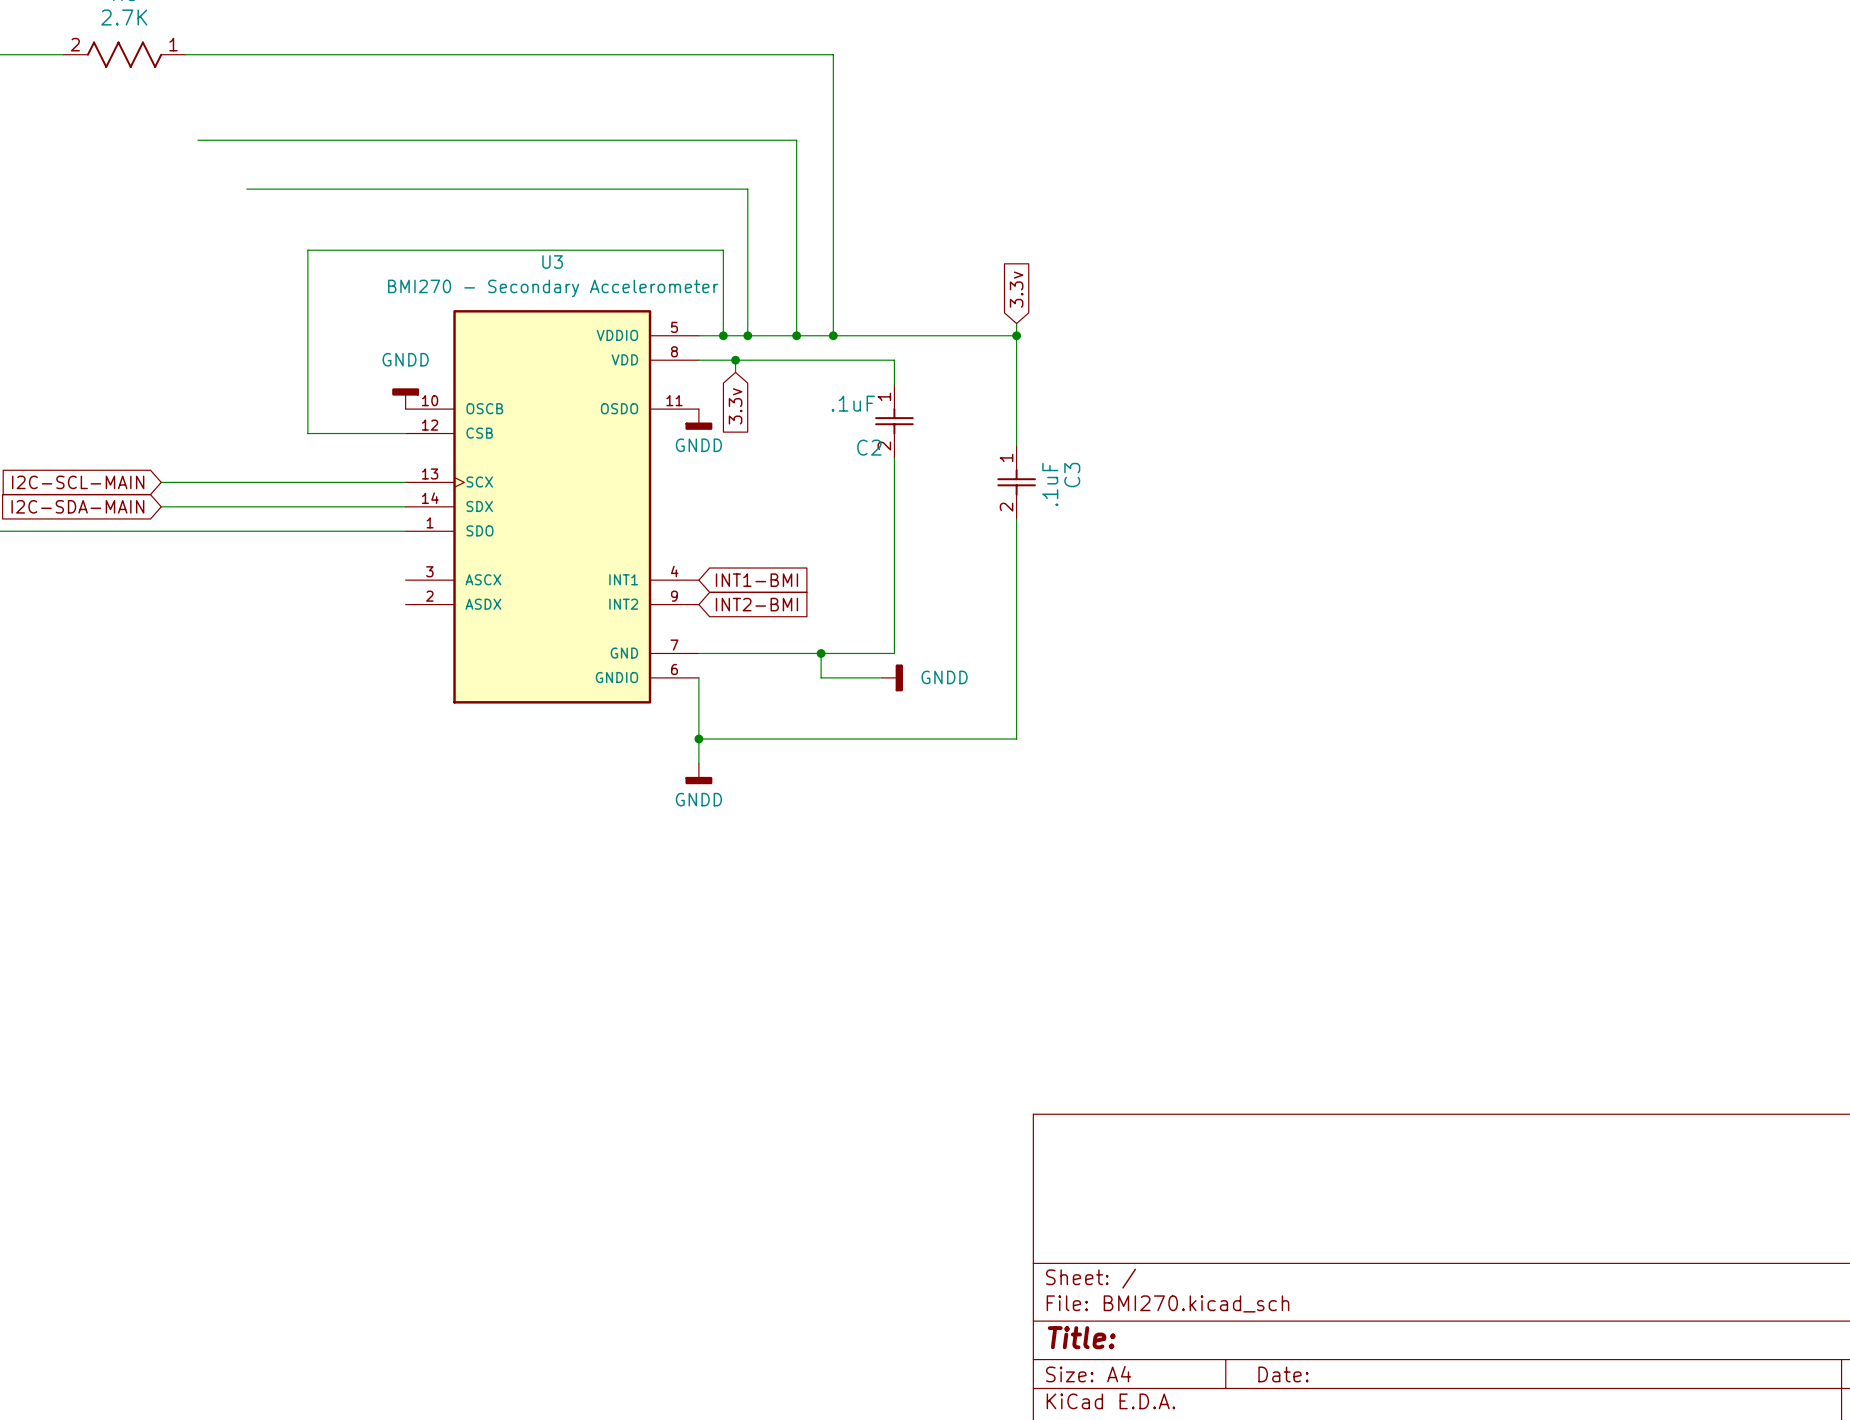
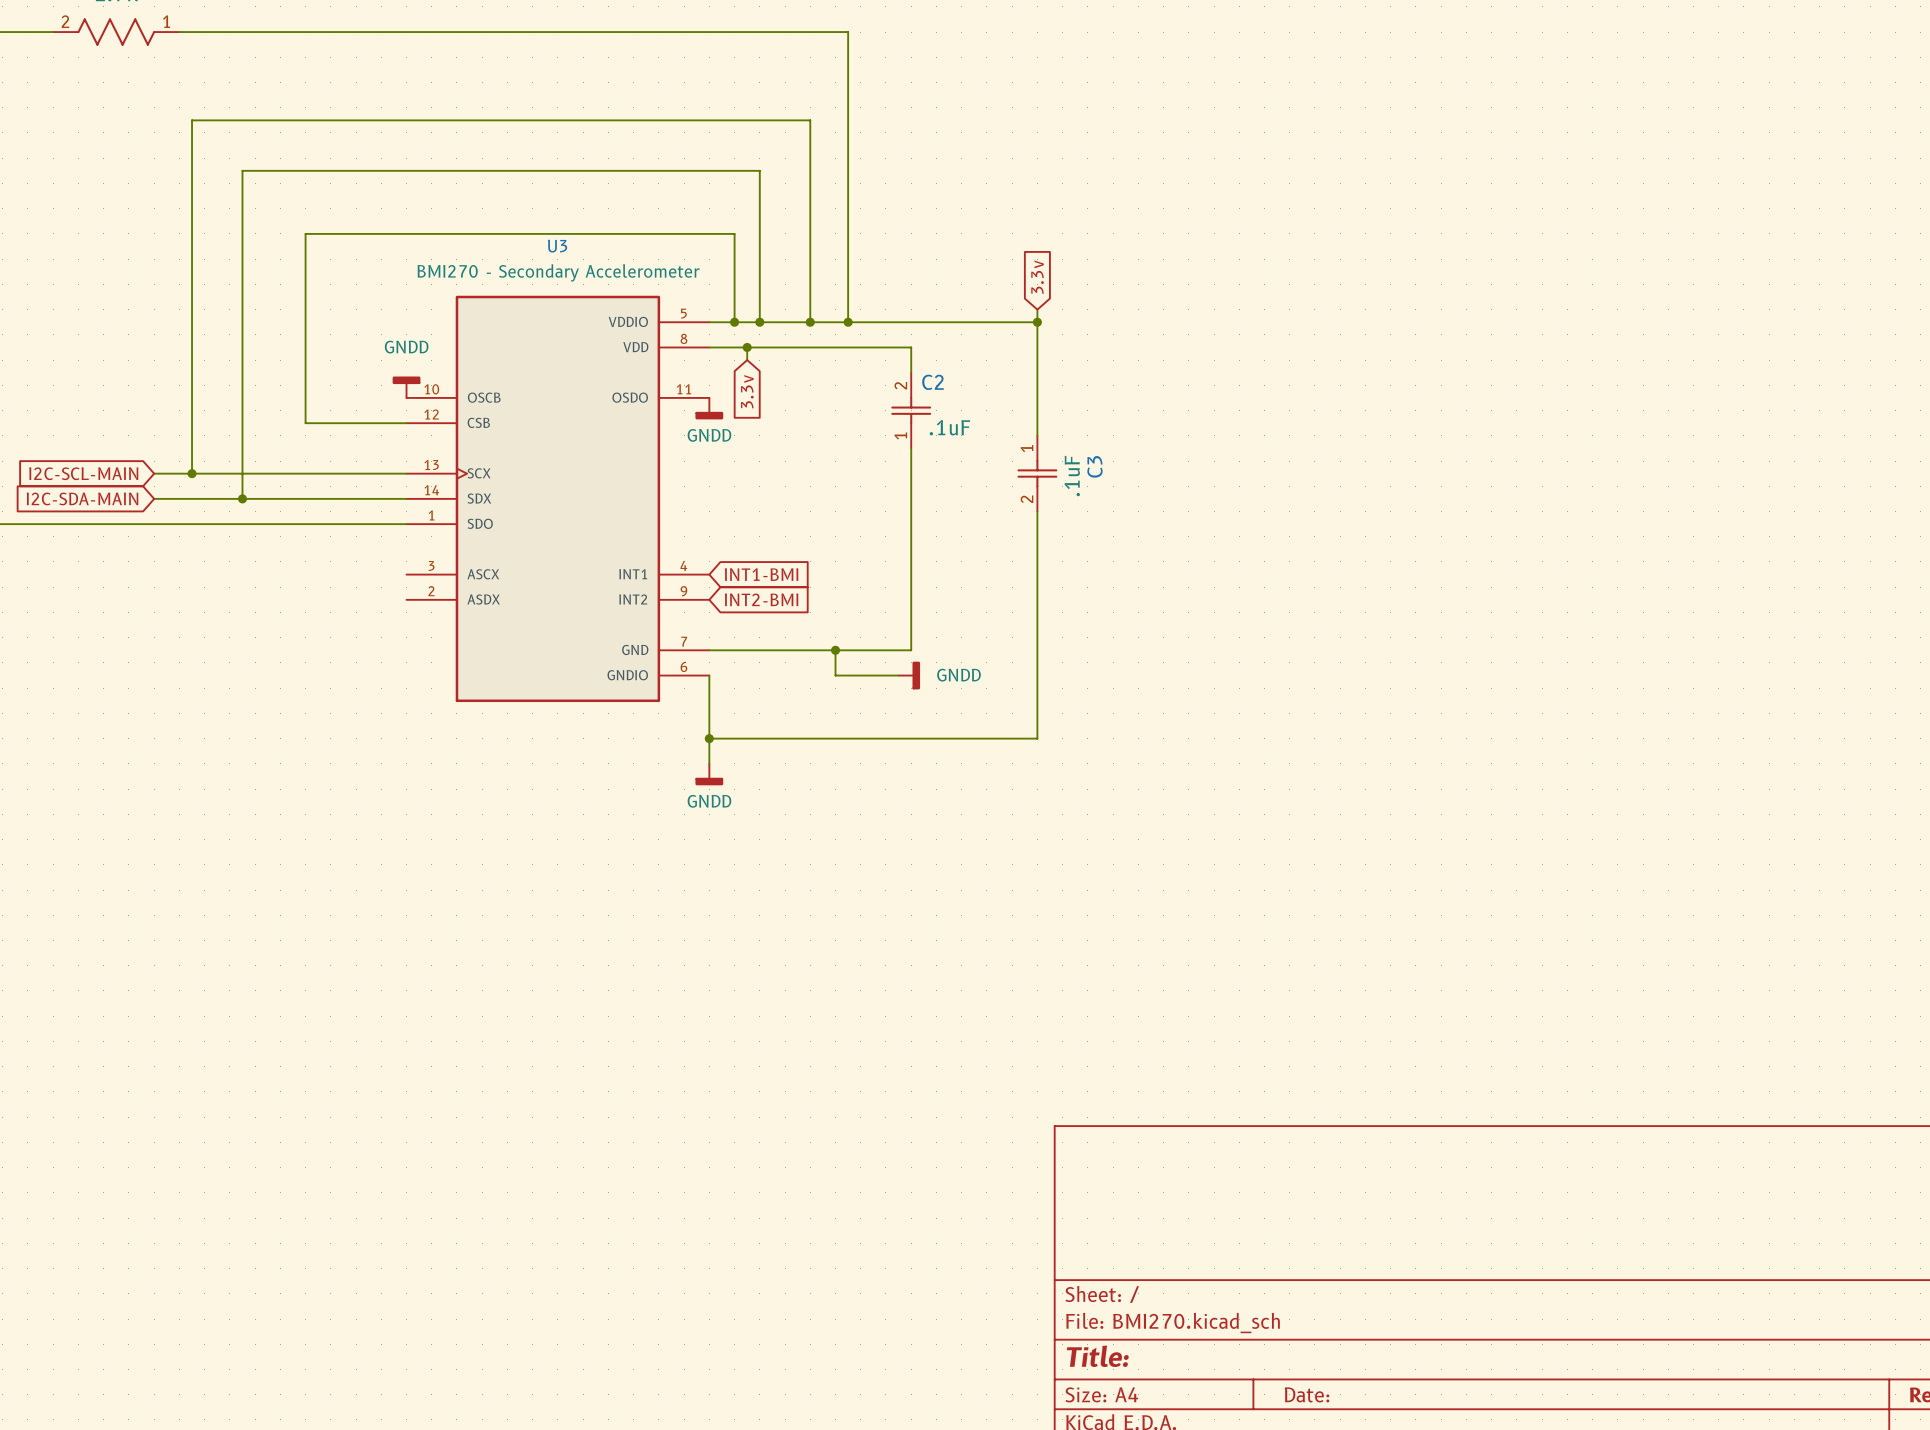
wire: none -> (192, 120) (192, 473)
wire: none -> (242, 170) (242, 498)
C2 rotation: 0° (894, 421) -> 180° (911, 410)
junction: none -> (192, 473)
junction: none -> (242, 498)

